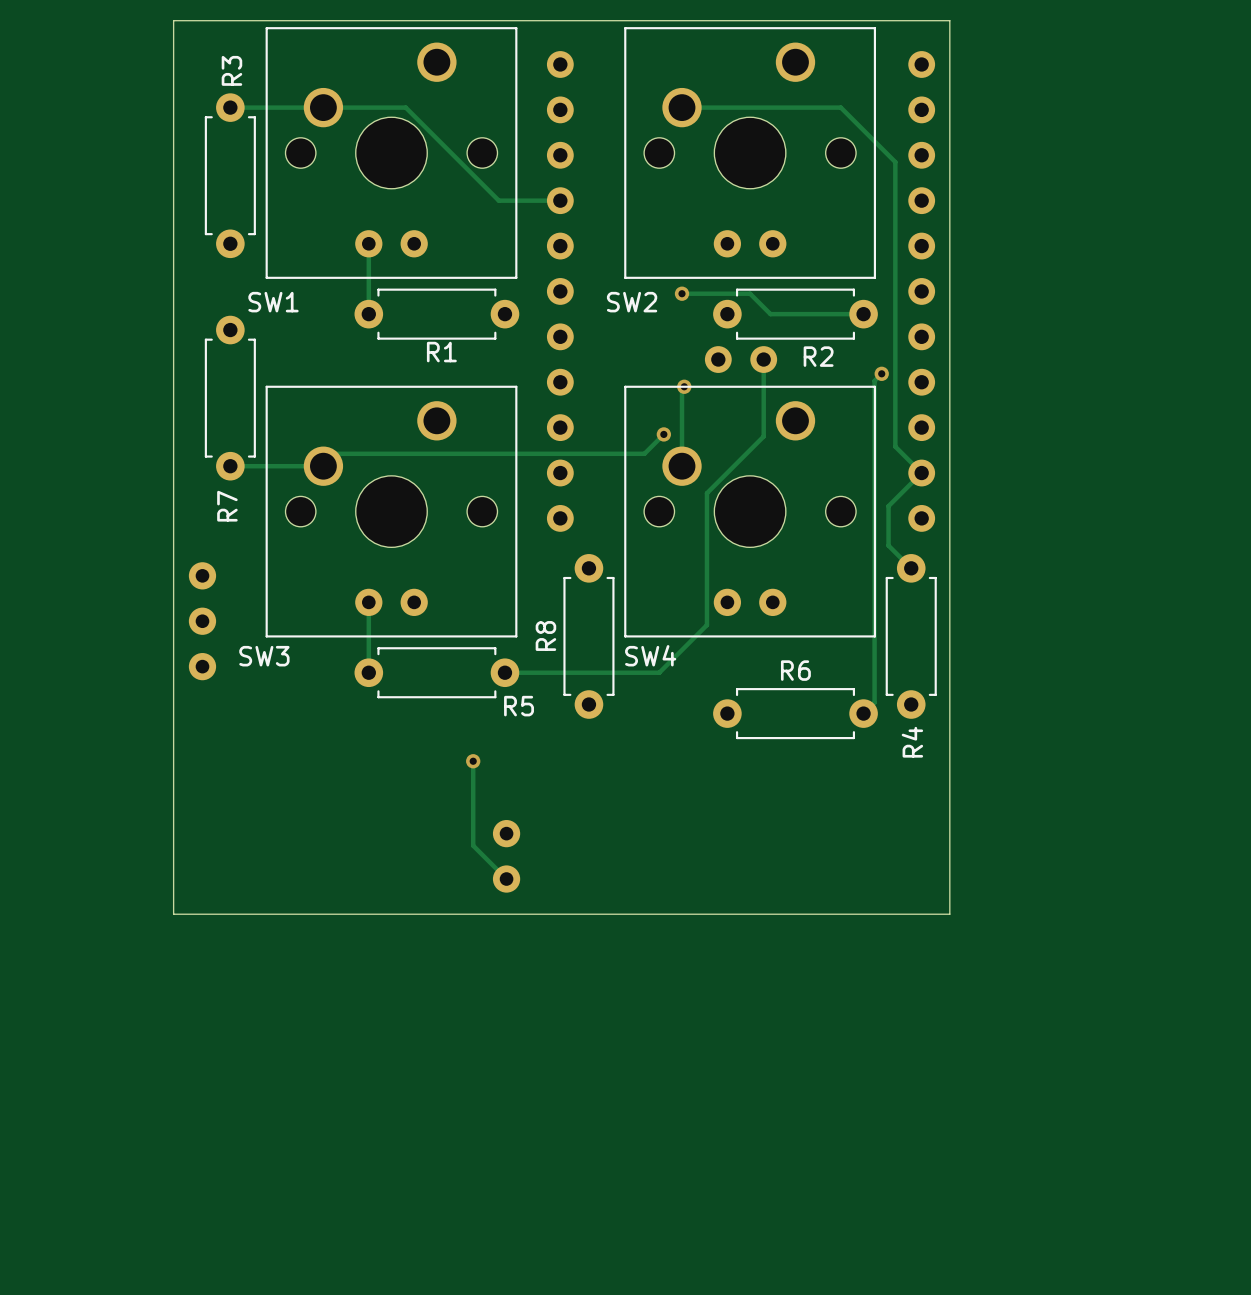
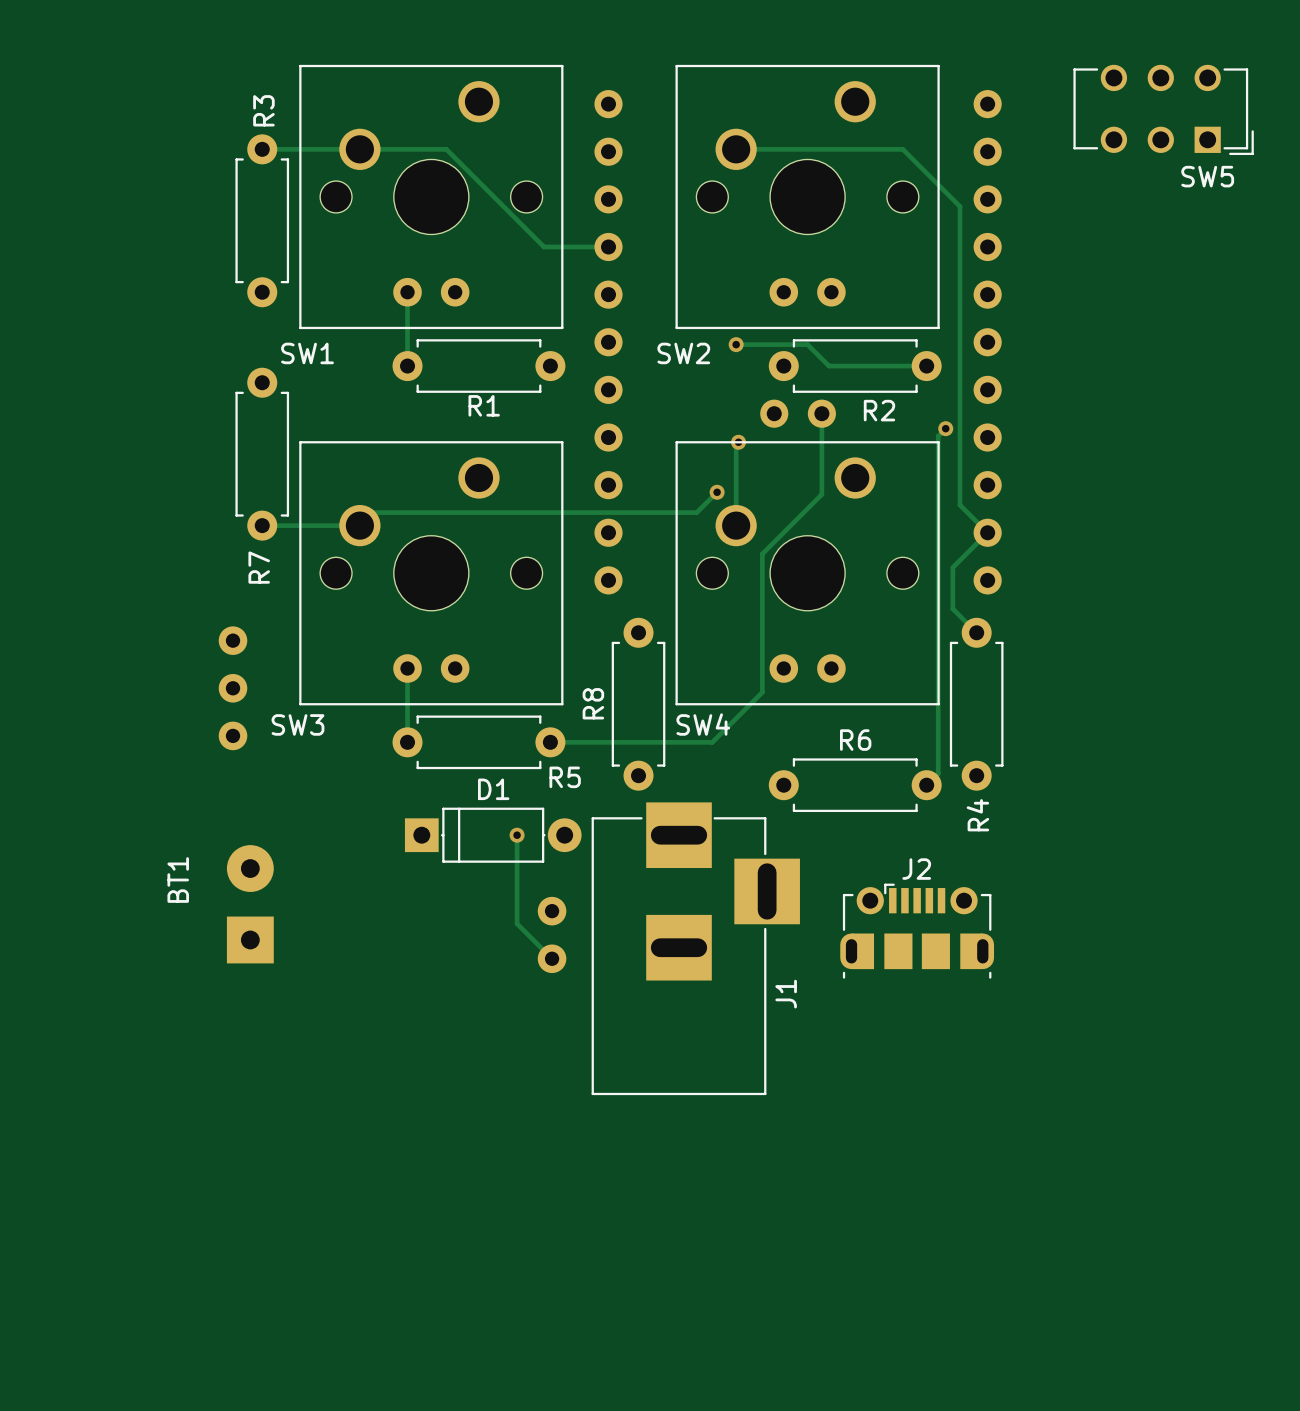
board edge: (173, 20) (173, 914) (949, 914) (949, 20) (173, 20) -> none
SW5: none -> (1163, 109)
D1: none -> (493, 835)
BT1: none -> (250, 904)
J2: none -> (917, 931)
J1: none -> (695, 948)

